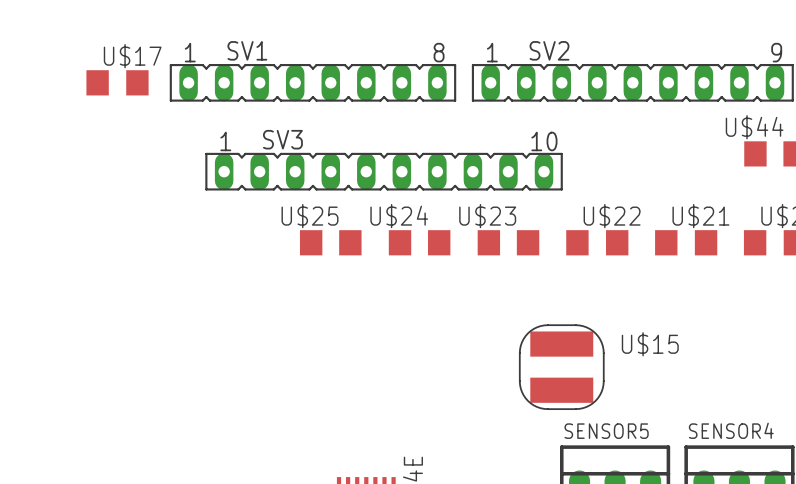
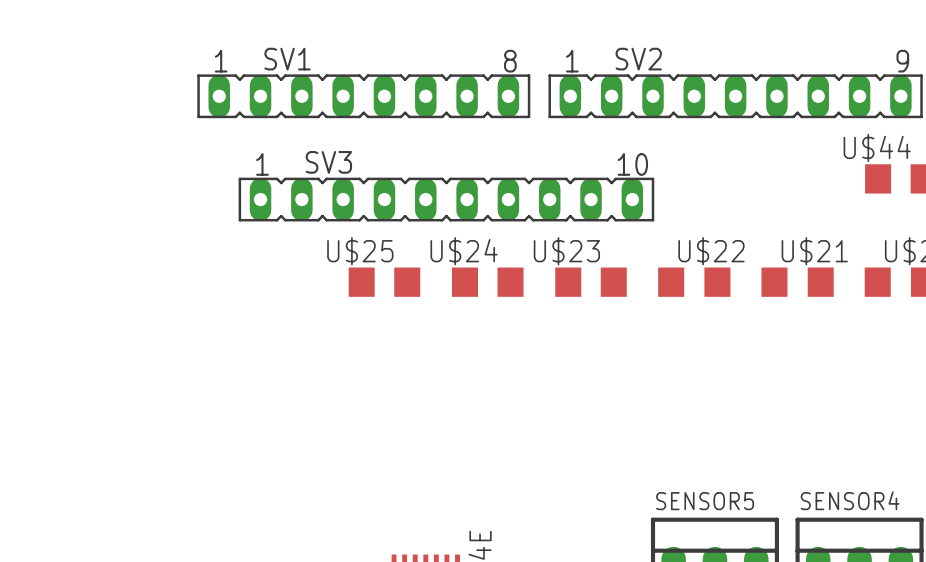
U$17: (117, 82) -> none
U$15: (561, 367) -> none

